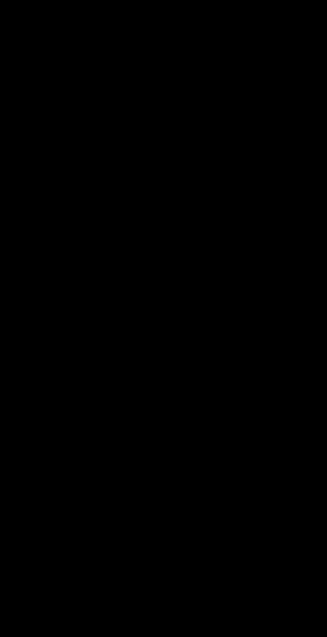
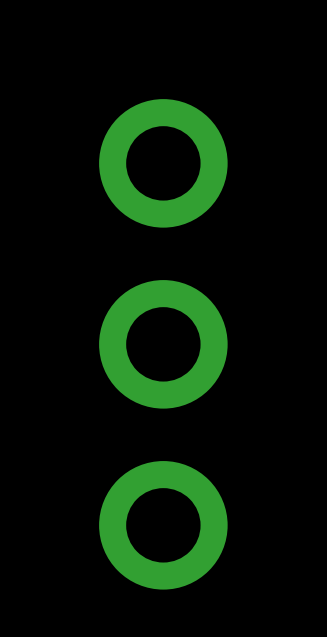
part: none -> (163, 163)
part: none -> (163, 344)
part: none -> (163, 525)

